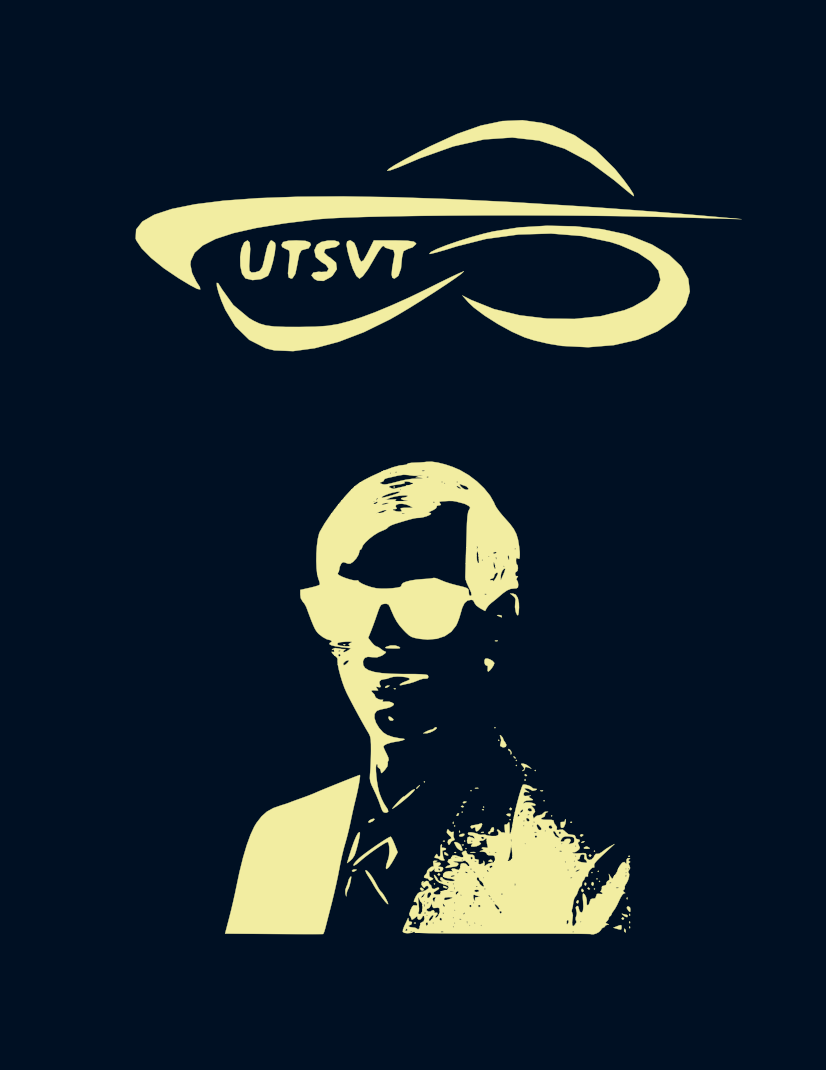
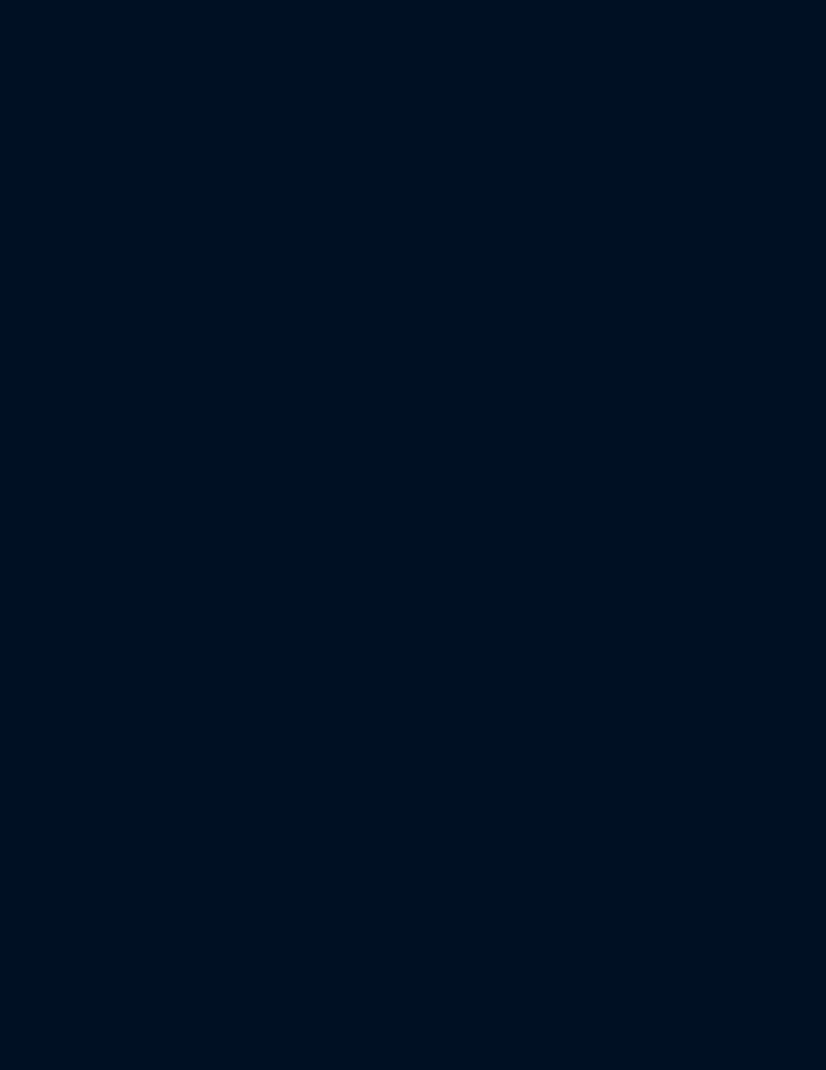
drawing: [135, 120, 742, 352] -> none
drawing: [224, 461, 631, 935] -> none

